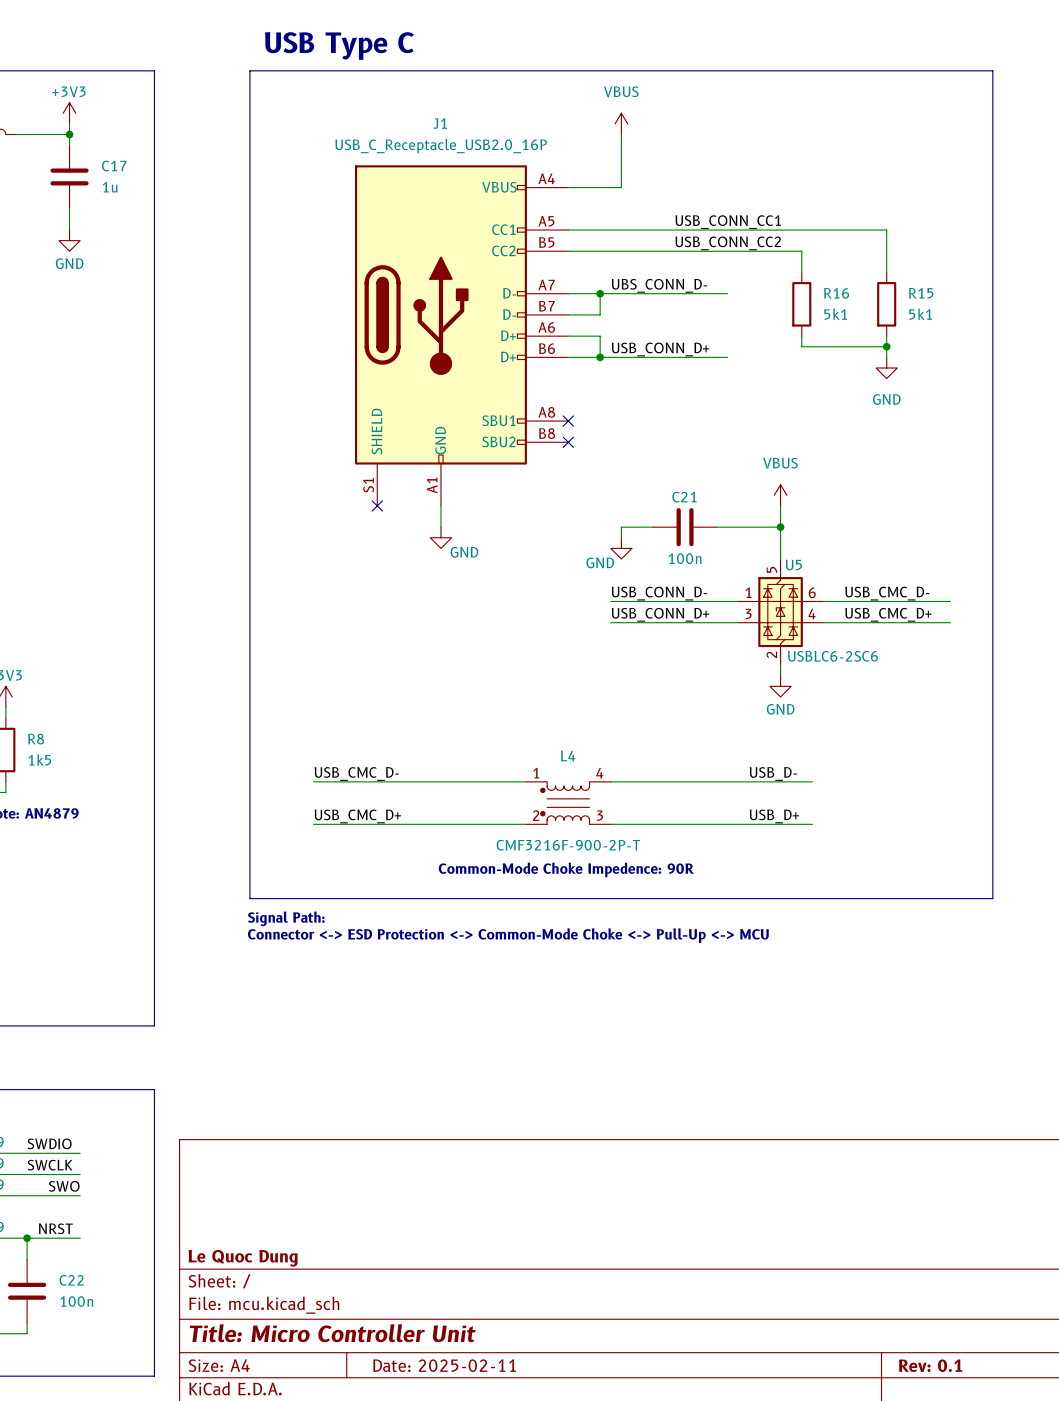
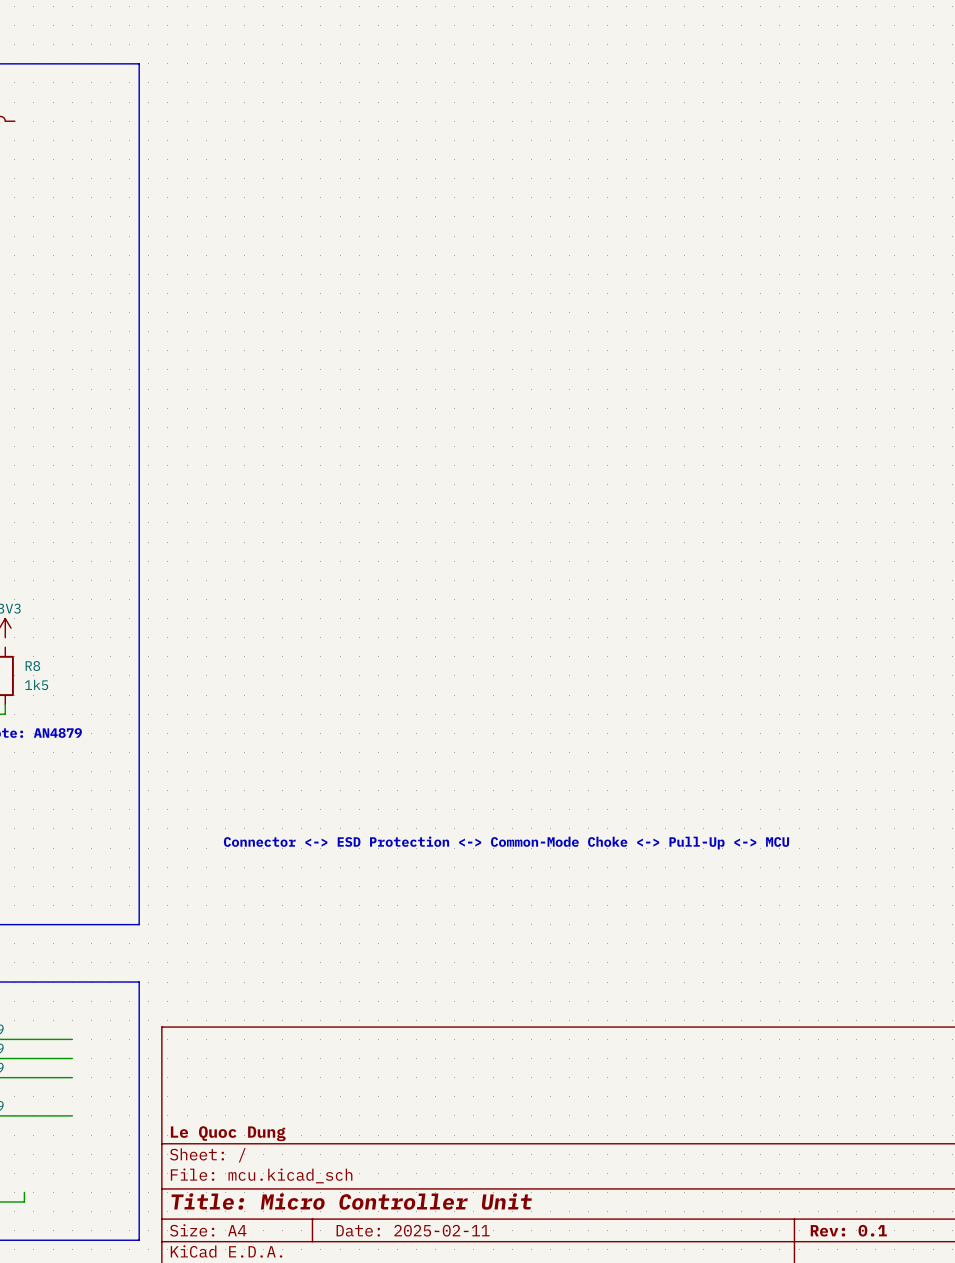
text: USB Type C (339, 45) -> none
line: (249, 70) (992, 70) (992, 898) (249, 898) (249, 70) -> none
power symbol: +3V3 (69, 113) -> none
wire: (69, 123) (69, 145) -> none
power symbol: VBUS (621, 123) -> none
wire: (16, 134) (69, 134) -> none
junction: (69, 134) -> none
wire: (621, 134) (621, 187) (568, 187) -> none
C17: 1u (69, 176) -> none
wire: (69, 208) (69, 230) -> none
label: USB_CONN_CC1 (728, 222) -> none
wire: (568, 230) (886, 230) (886, 272) -> none
power symbol: GND (69, 240) -> none
label: USB_CONN_CC2 (728, 243) -> none
wire: (568, 251) (801, 251) (801, 272) -> none
label: UBS_CONN_D- (659, 285) -> none
wire: (568, 293) (727, 293) -> none
wire: (600, 293) (600, 314) (568, 314) -> none
junction: (600, 293) -> none
R16: 5k1 (801, 304) -> none
R15: 5k1 (886, 304) -> none
J1: USB_C_Receptacle_USB2.0_16P (461, 335) -> none
wire: (568, 336) (600, 336) (600, 357) -> none
wire: (801, 336) (801, 346) (886, 346) -> none
wire: (886, 336) (886, 357) -> none
junction: (886, 346) -> none
label: USB_CONN_D+ (660, 349) -> none
wire: (568, 357) (727, 357) -> none
junction: (600, 357) -> none
power symbol: GND (886, 367) -> none
no-connect mark: (568, 421) -> none
no-connect mark: (568, 442) -> none
power symbol: VBUS (780, 495) -> none
no-connect mark: (377, 505) -> none
wire: (440, 505) (440, 527) -> none
wire: (780, 505) (780, 559) -> none
wire: (653, 527) (621, 527) (621, 537) -> none
C21: 100n (685, 527) -> none
wire: (716, 527) (780, 527) -> none
junction: (780, 527) -> none
power symbol: GND (440, 537) -> none
power symbol: GND (621, 548) -> none
label: USB_CONN_D- (659, 593) -> none
label: USB_CMC_D- (887, 593) -> none
wire: (610, 601) (738, 601) -> none
wire: (823, 601) (950, 601) -> none
U5: USBLC6-2SC6 (780, 612) -> none
label: USB_CONN_D+ (660, 614) -> none
label: USB_CMC_D+ (888, 614) -> none
wire: (610, 622) (738, 622) -> none
wire: (823, 622) (950, 622) -> none
wire: (780, 665) (780, 675) -> none
power symbol: GND (780, 686) -> none
wire: (5, 707) (5, 718) -> none
label: USB_CMC_D- (356, 773) -> none
label: USB_D- (773, 773) -> none
wire: (313, 781) (525, 781) -> none
wire: (610, 781) (812, 781) -> none
L4: CMF3216F-900-2P-T (568, 803) -> none
label: USB_CMC_D+ (357, 816) -> none
label: USB_D+ (774, 816) -> none
wire: (313, 824) (525, 824) -> none
wire: (610, 824) (812, 824) -> none
text: Common-Mode Choke Impedence: 90R (566, 869) -> none
text: Signal Path: (286, 918) -> none
label: SWDIO (49, 1143) -> none
label: SWCLK (50, 1165) -> none
label: SWO (64, 1186) -> none
label: NRST (55, 1228) -> none
wire: (27, 1238) (27, 1259) -> none
junction: (27, 1238) -> none
C22: 100n (27, 1291) -> none

